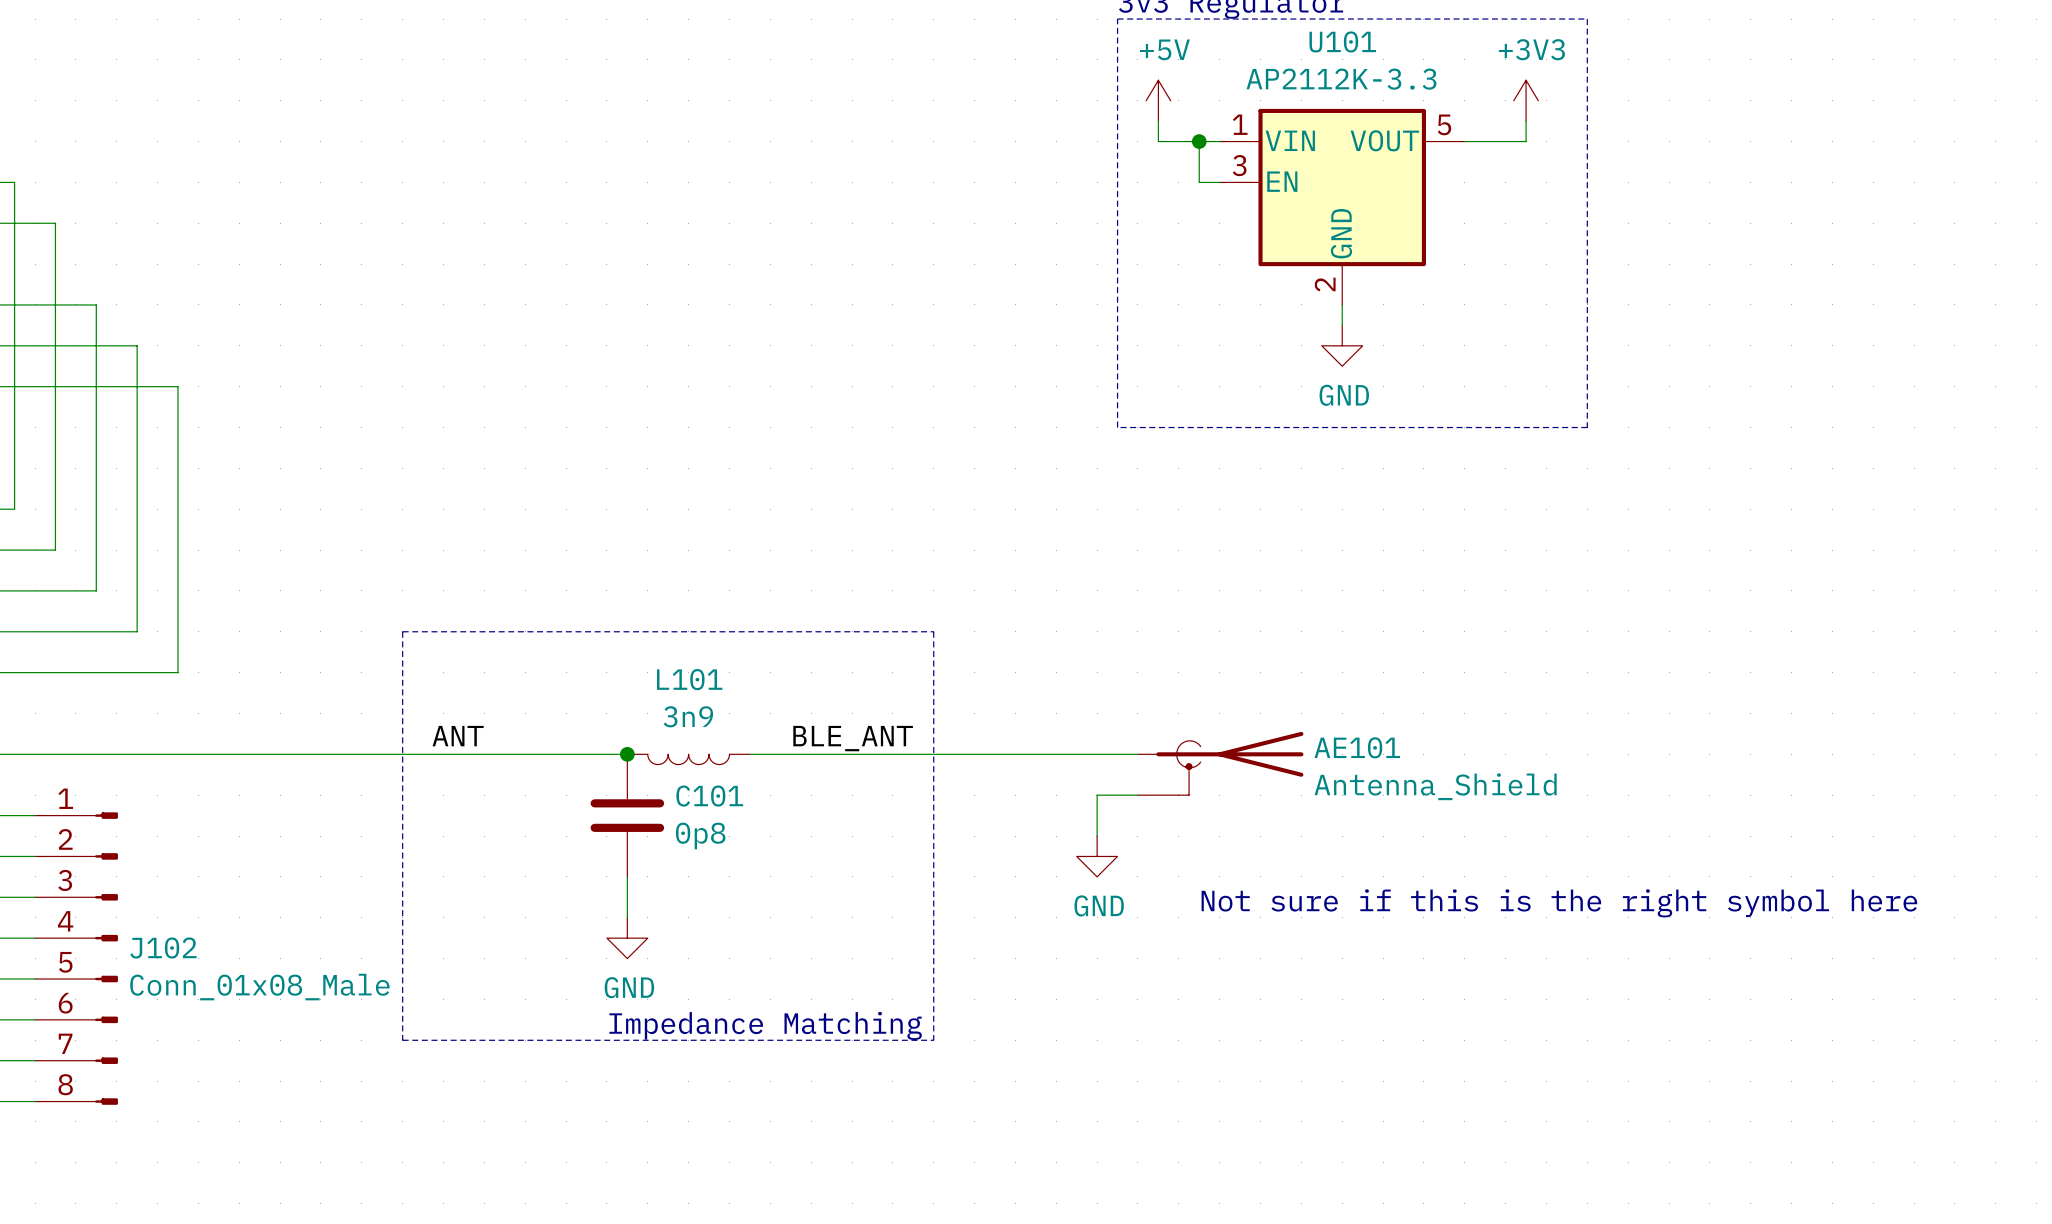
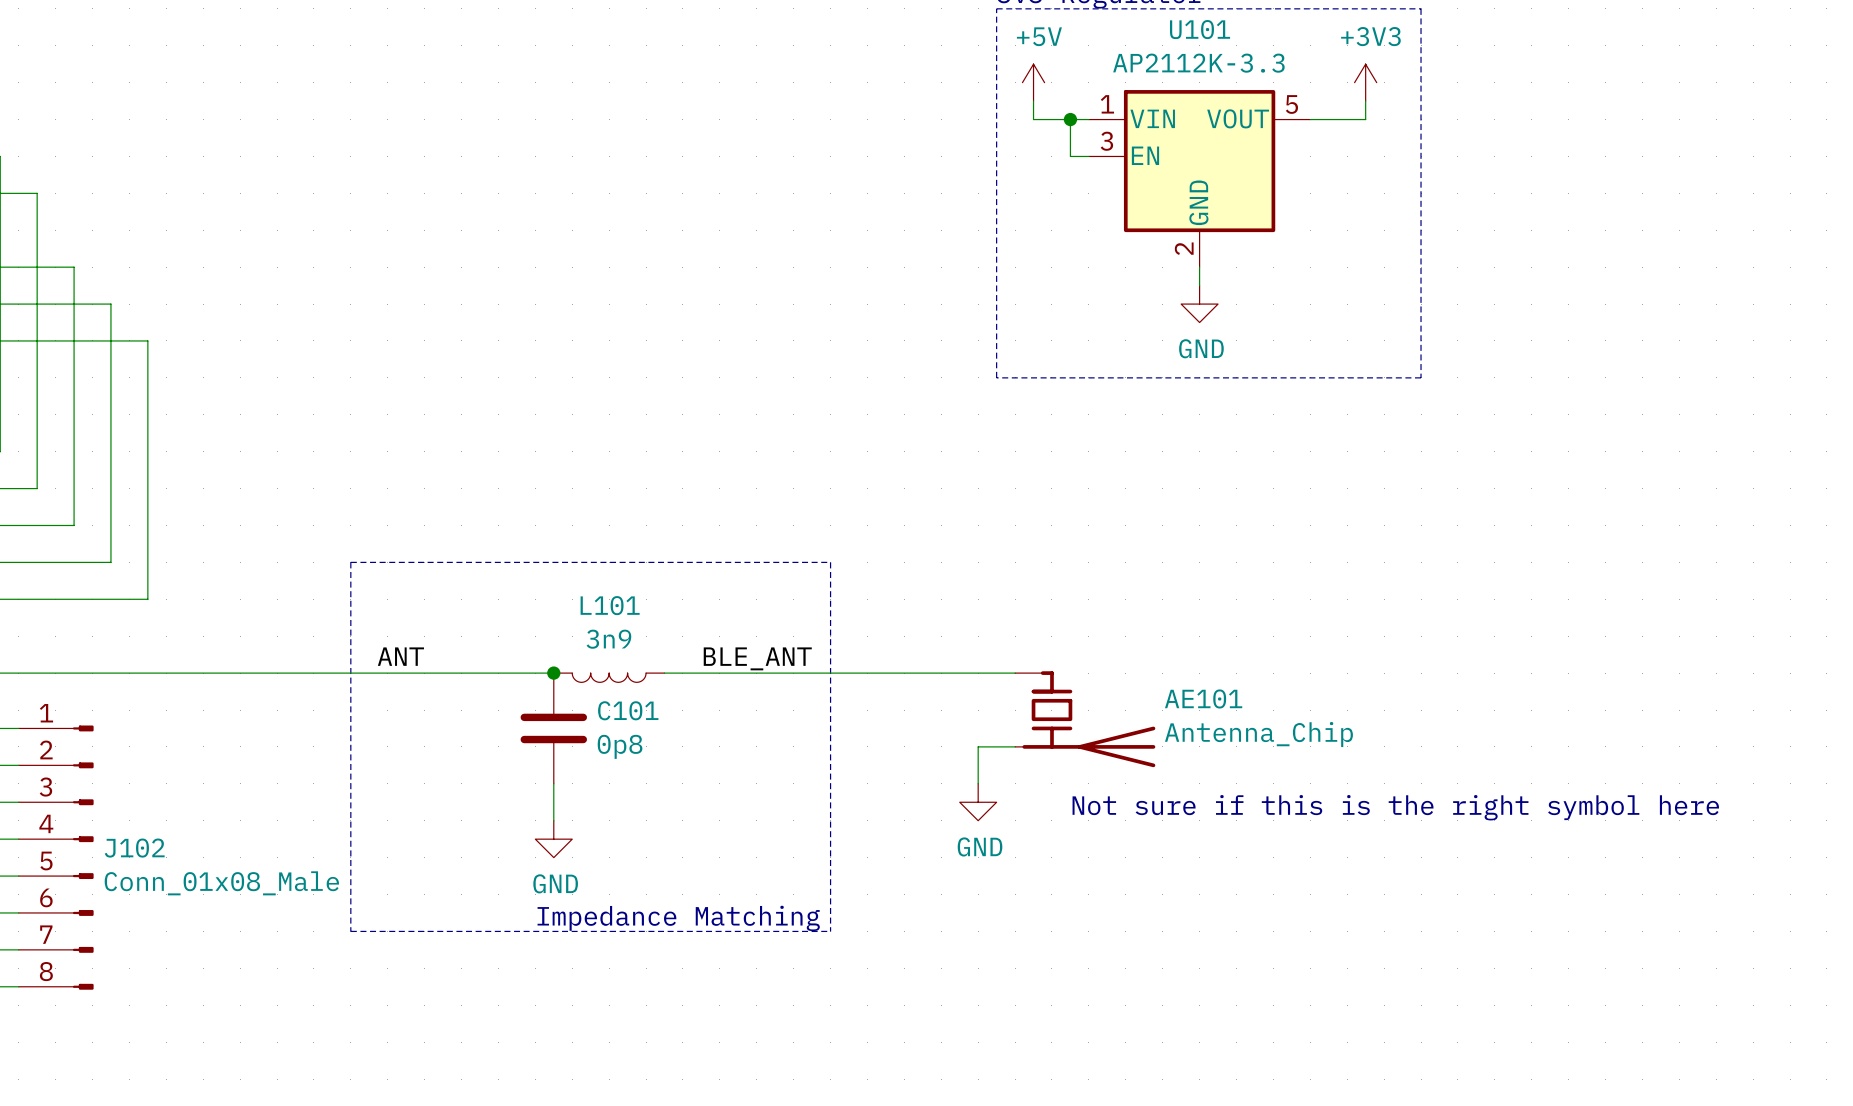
AE101 symbol: [1137, 731, 1304, 796] -> [1015, 671, 1156, 768]
AE101 value: Antenna_Shield (1435, 786) -> Antenna_Chip (1258, 734)
wire: (1137, 795) (1097, 795) (1097, 836) -> (1015, 746) (978, 746) (978, 783)
power symbol position: GND (1097, 856) -> GND (978, 802)

